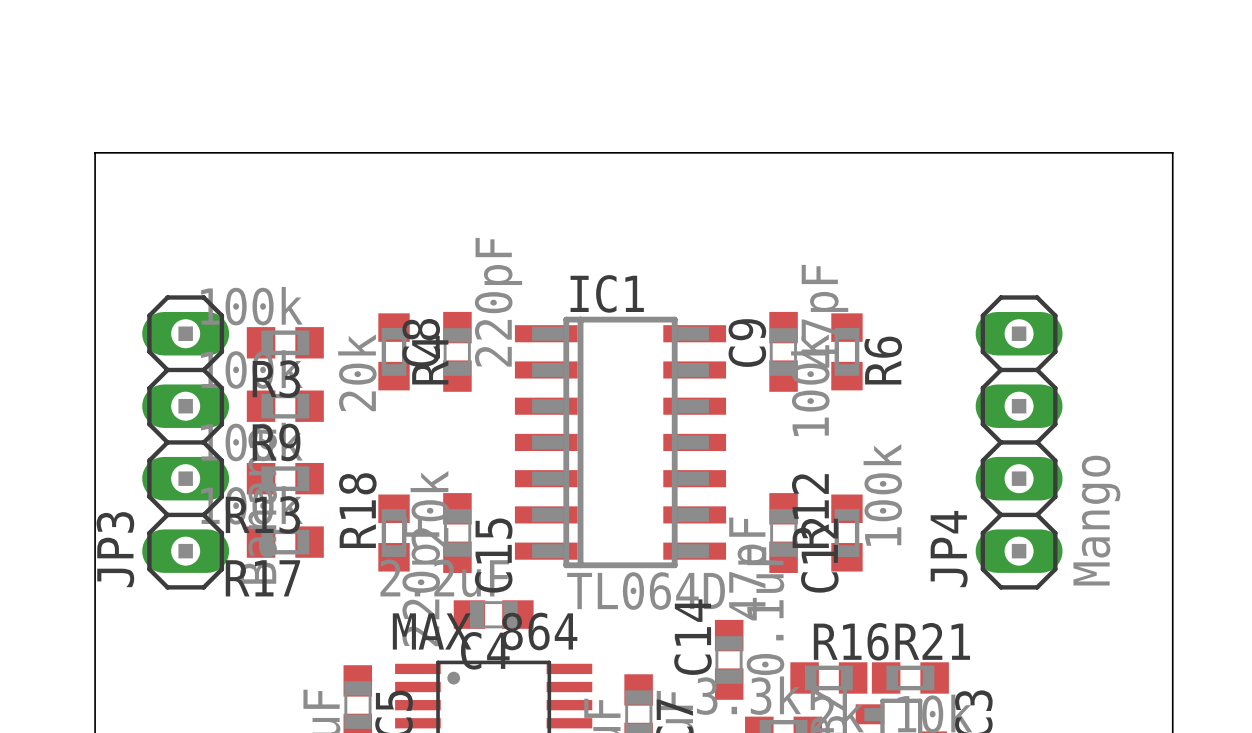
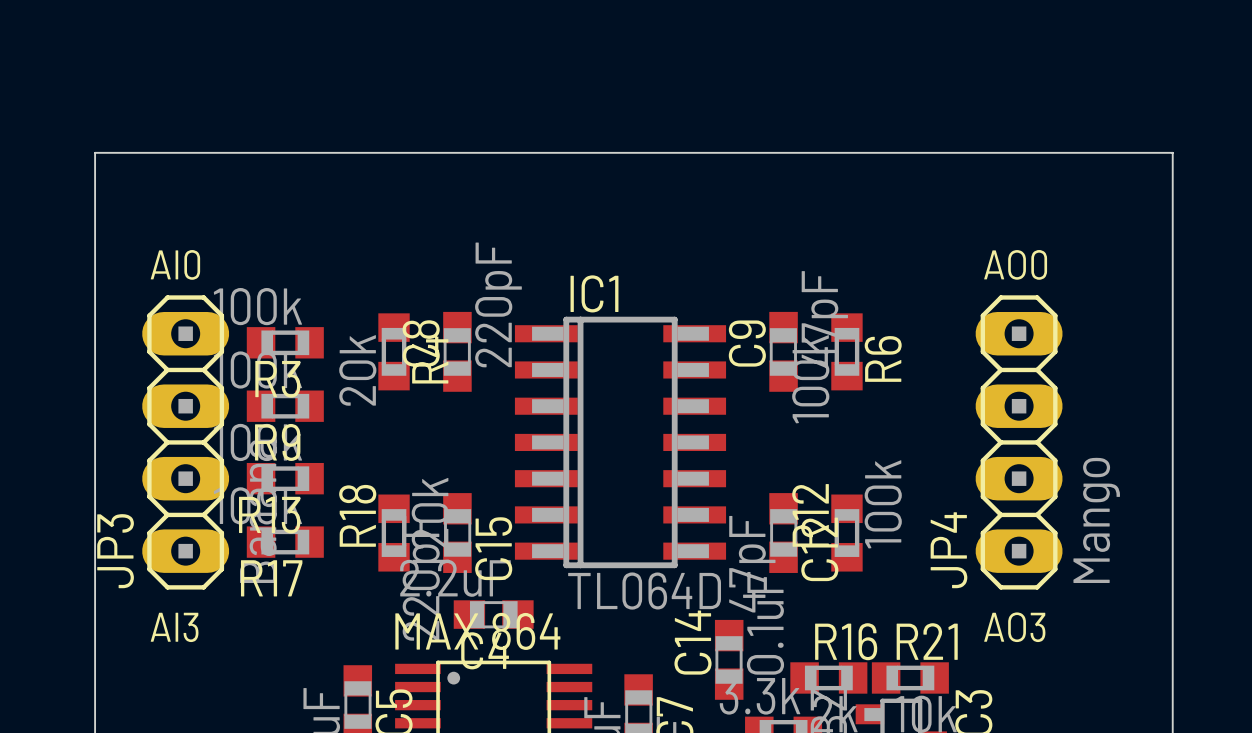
text: none -> AI0 (175, 264)
text: none -> AO0 (1015, 264)
text: none -> AI3 (174, 627)
text: none -> AO3 (1014, 627)

